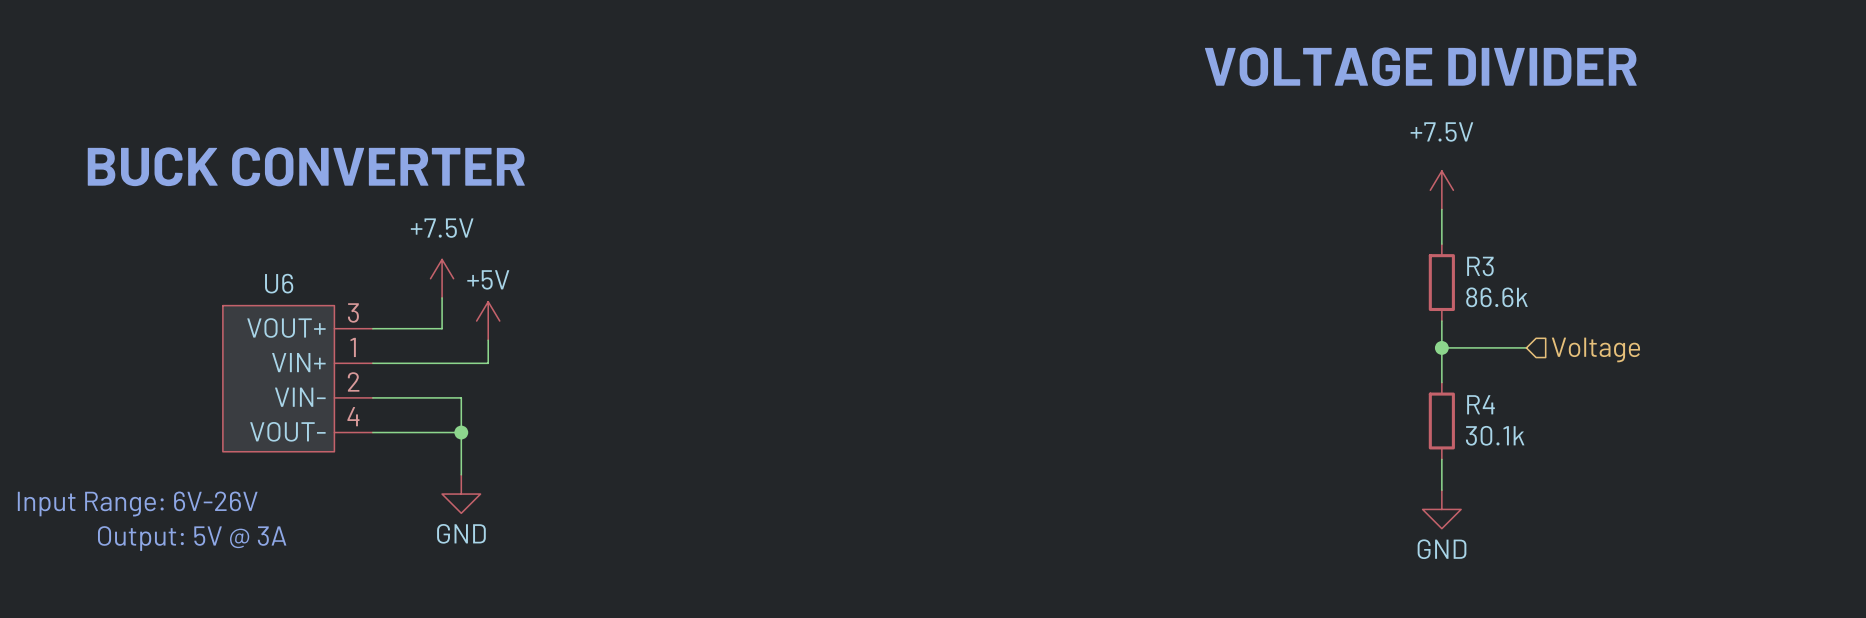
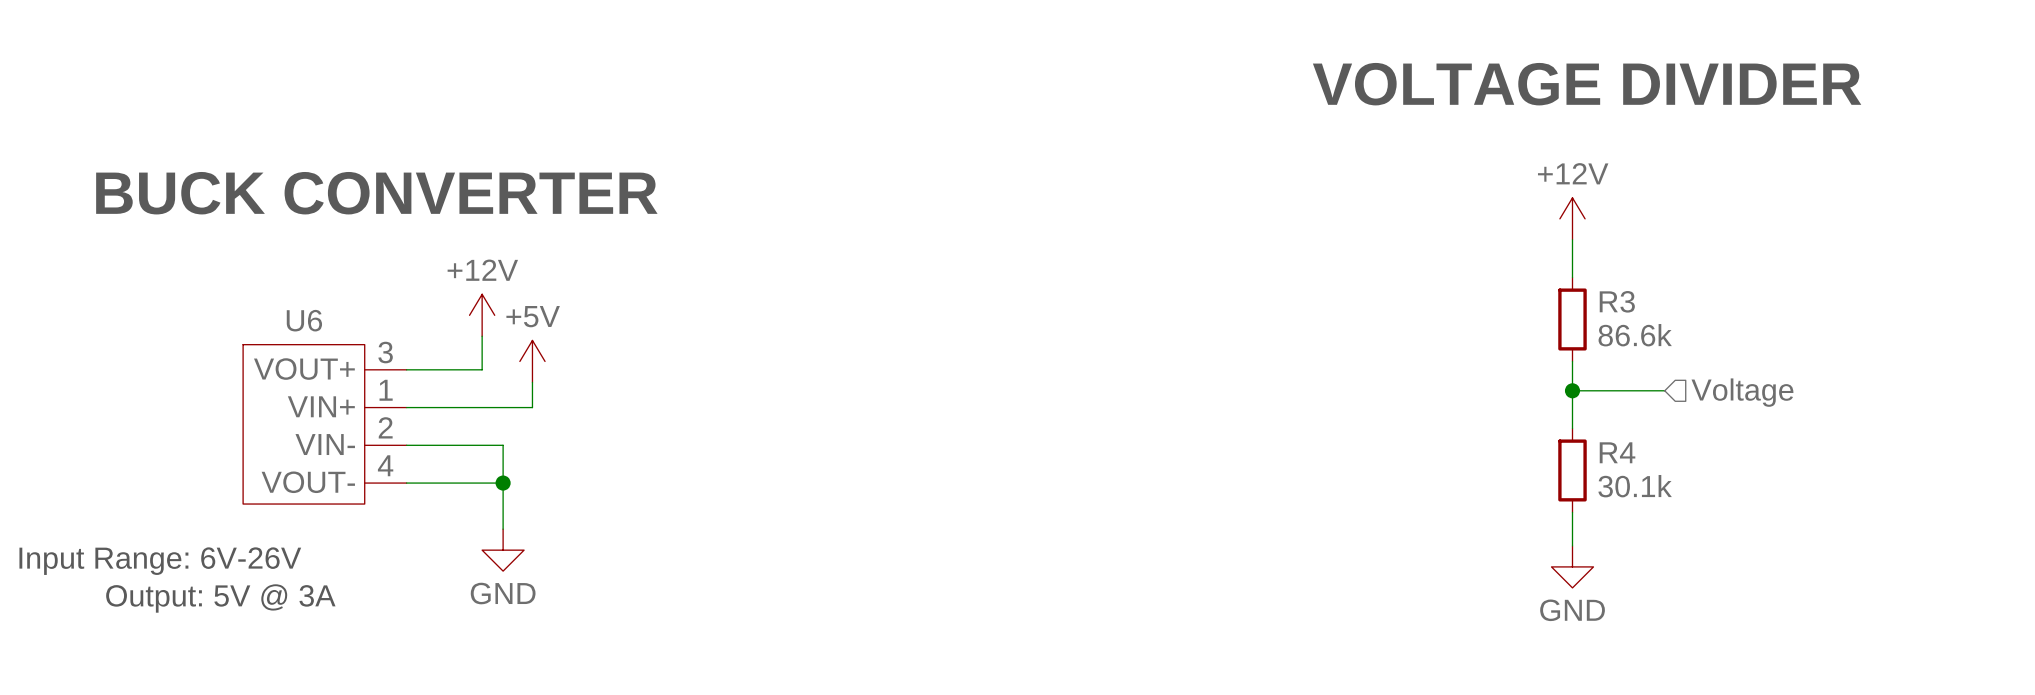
power symbol: +7.5V (1441, 190) -> +12V (1572, 218)
power symbol: +7.5V (442, 278) -> +12V (482, 315)

